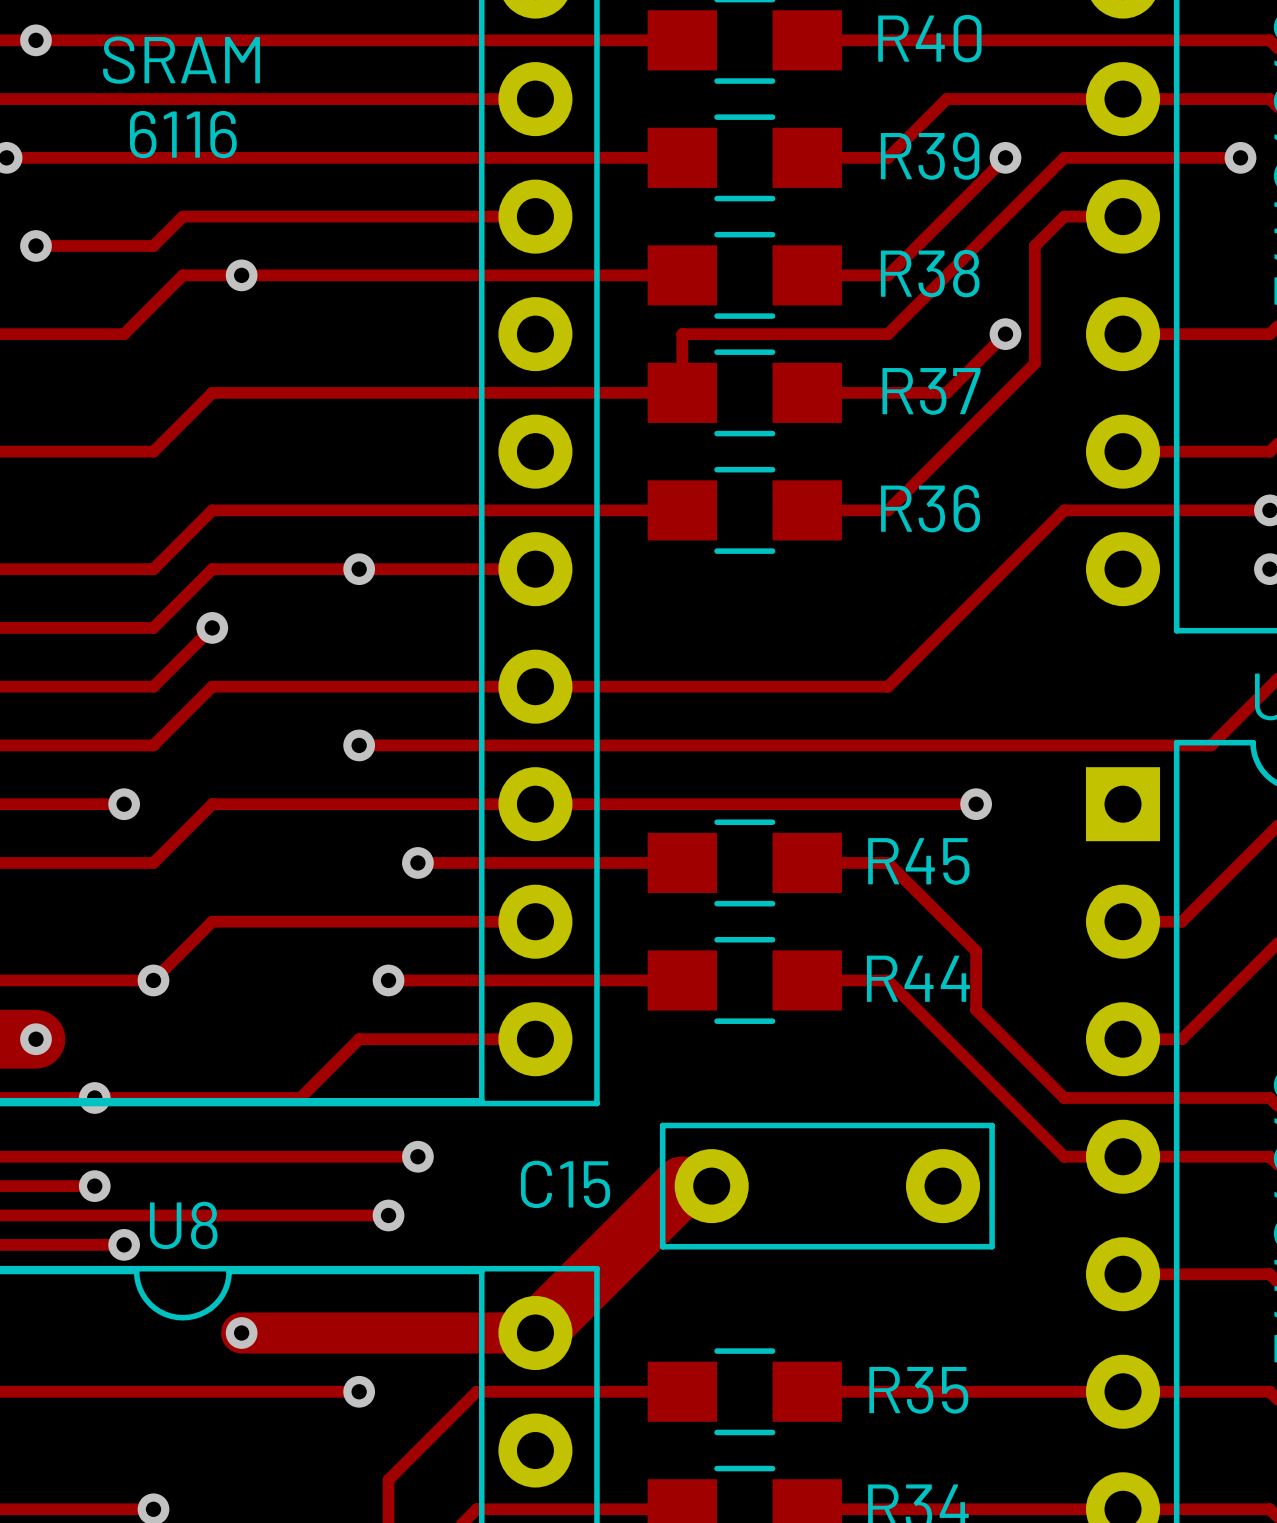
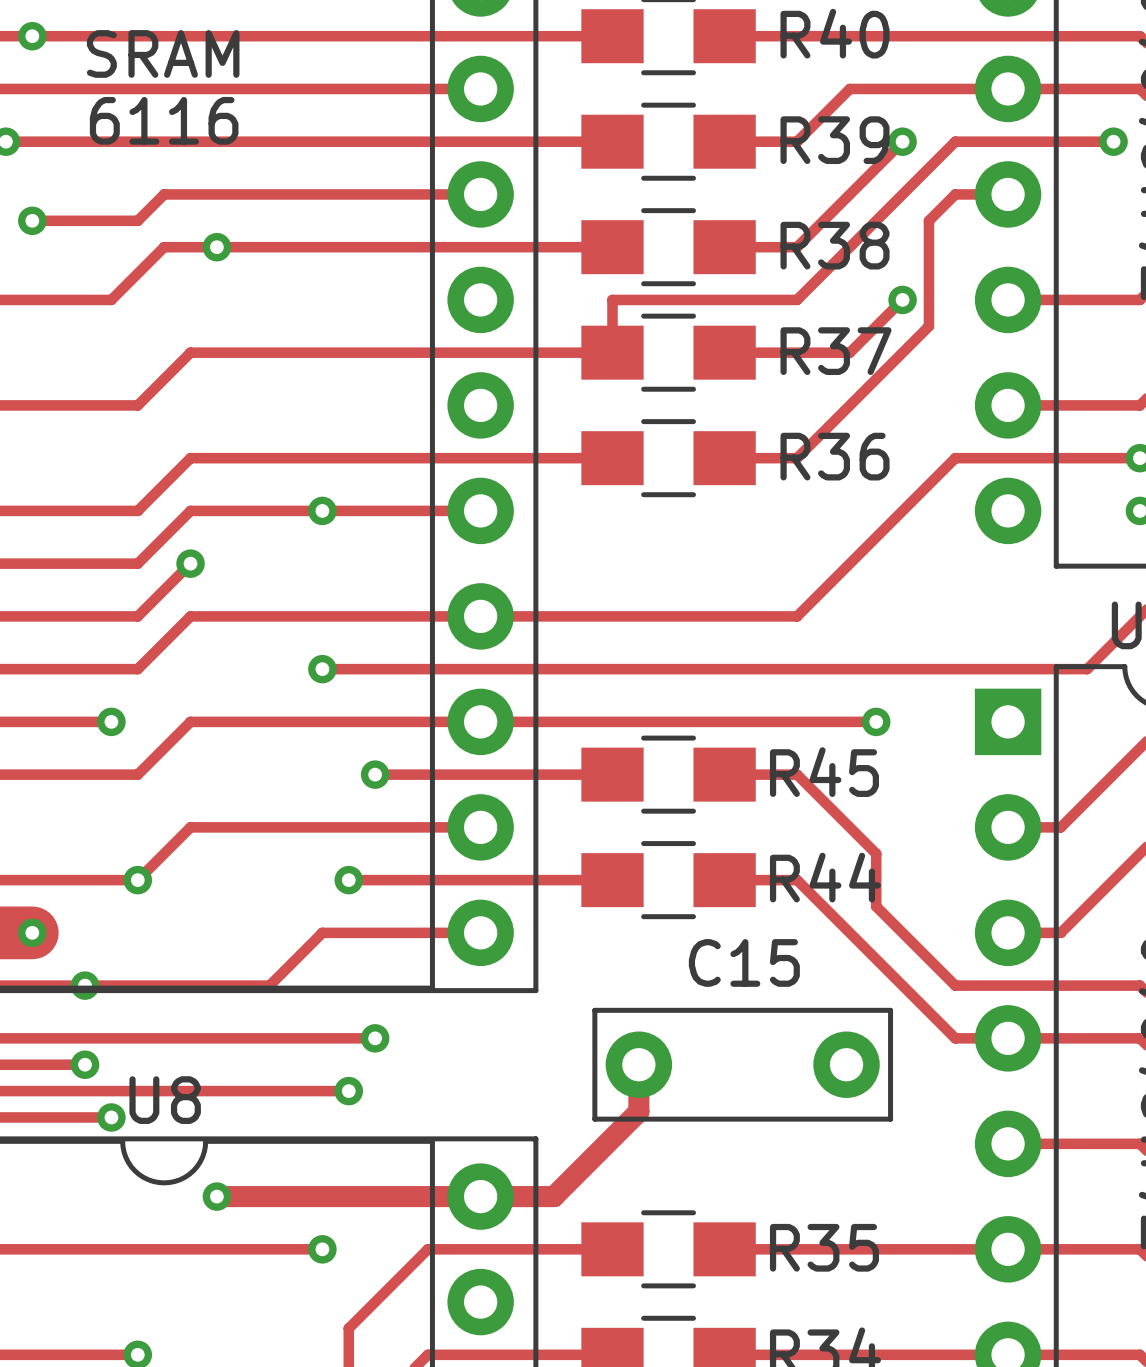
C15 name position: C15 (565, 1184) -> C15 (744, 962)
track: (711, 1186) (682, 1186) (535, 1333) -> (638, 1064) (638, 1111) (553, 1196) (480, 1196)
track width: thick (241, 1333) (535, 1333) -> thin (216, 1196) (480, 1196)

